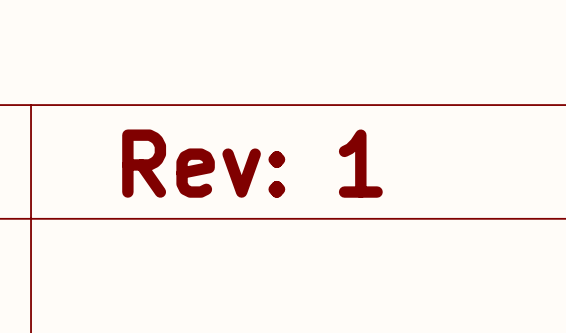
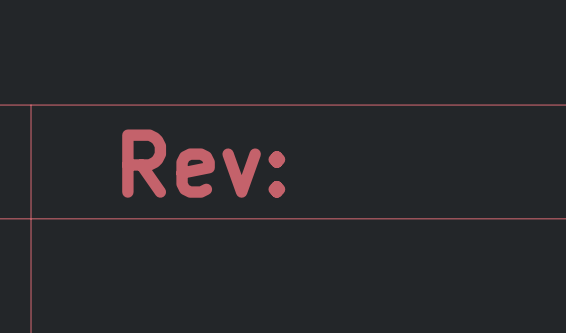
title block: Rev: 1 (252, 163) -> Rev: (203, 163)

